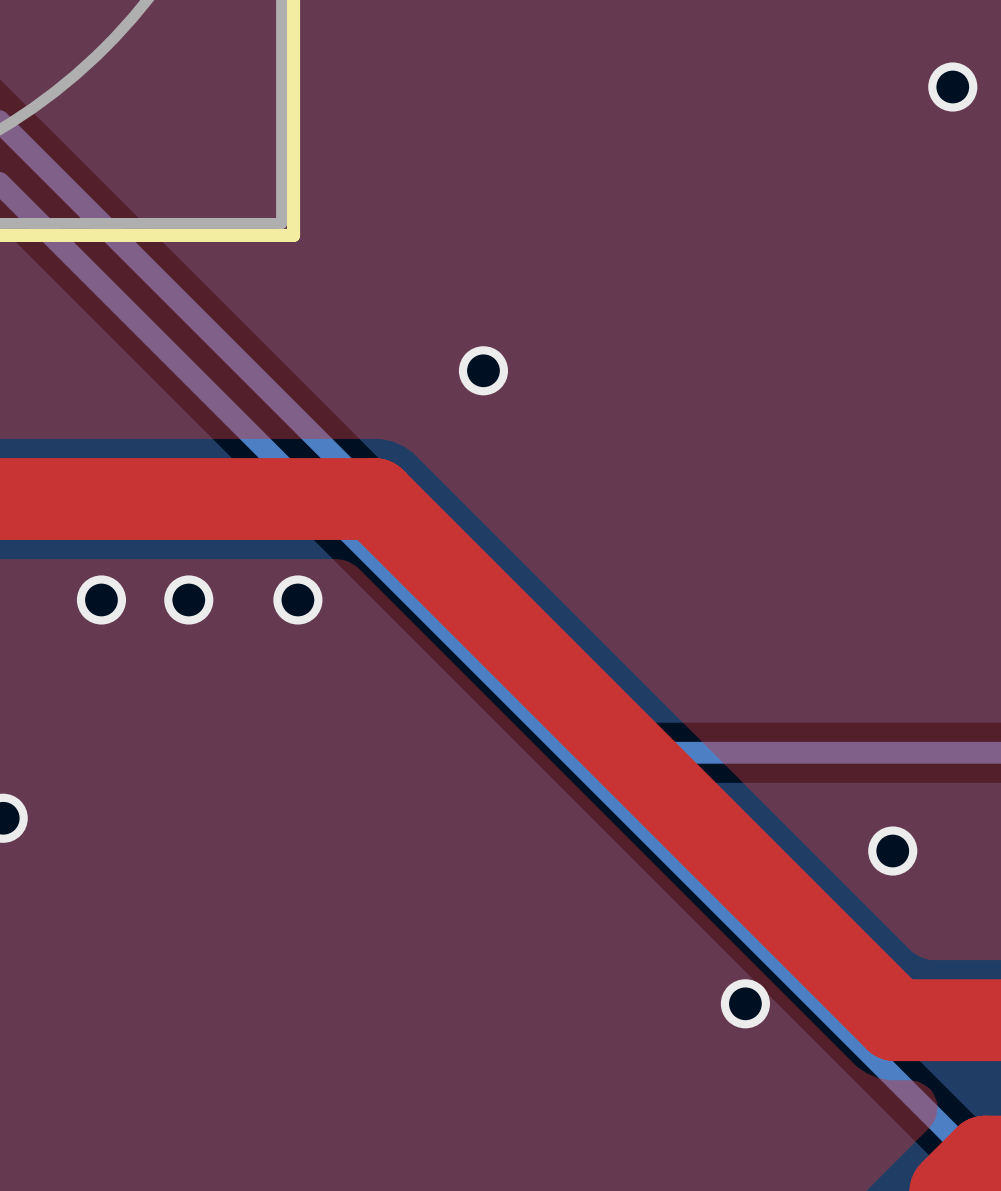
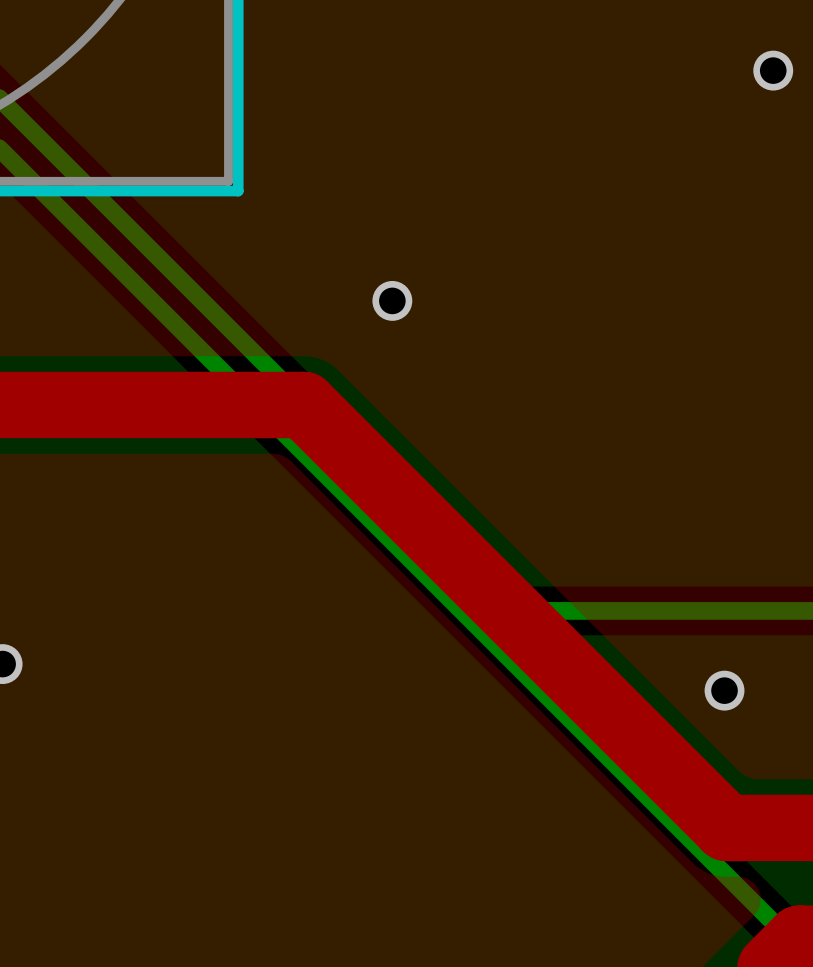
via: (101, 599) -> none
via: (188, 599) -> none
via: (297, 599) -> none
via: (745, 1003) -> none

